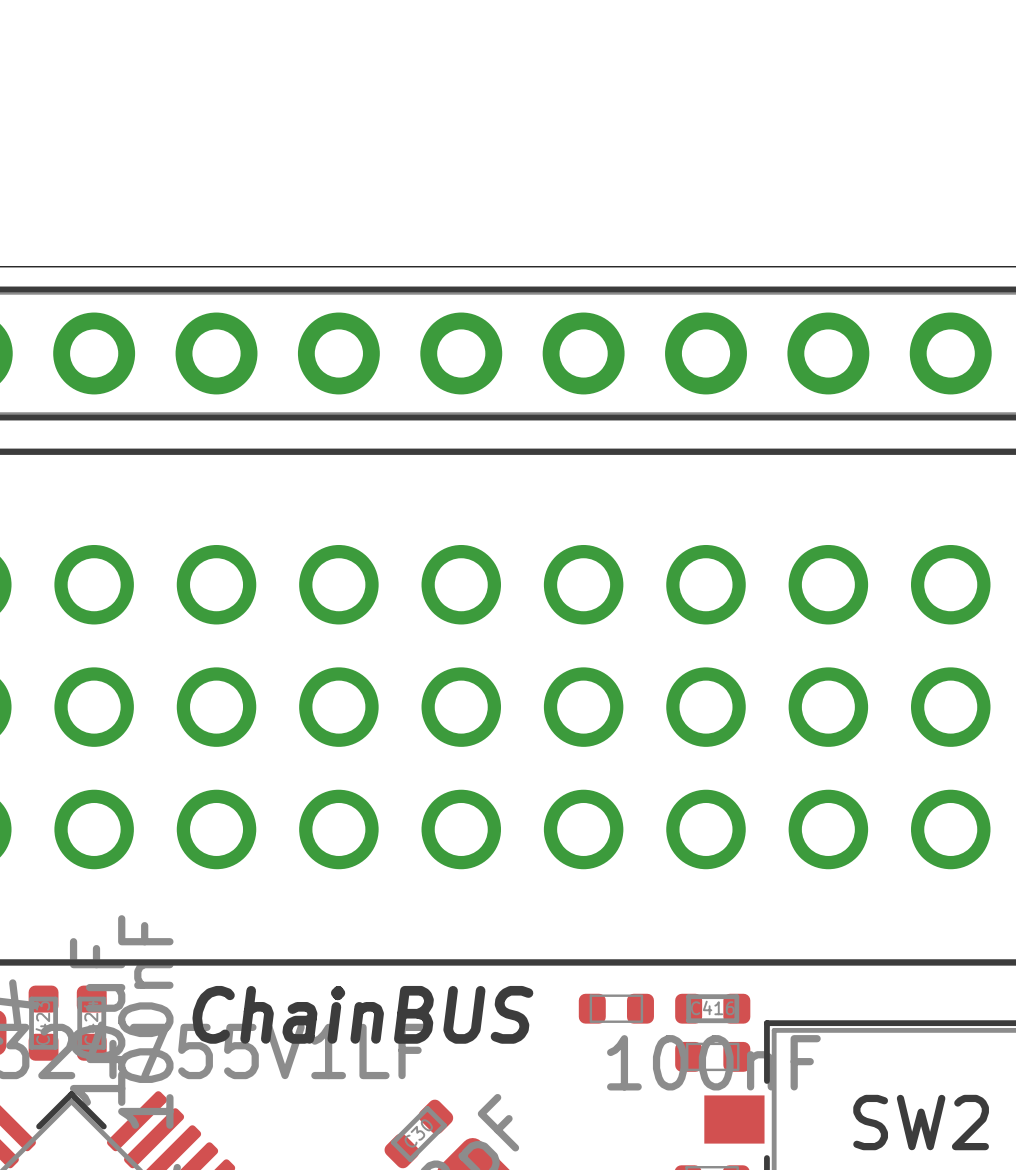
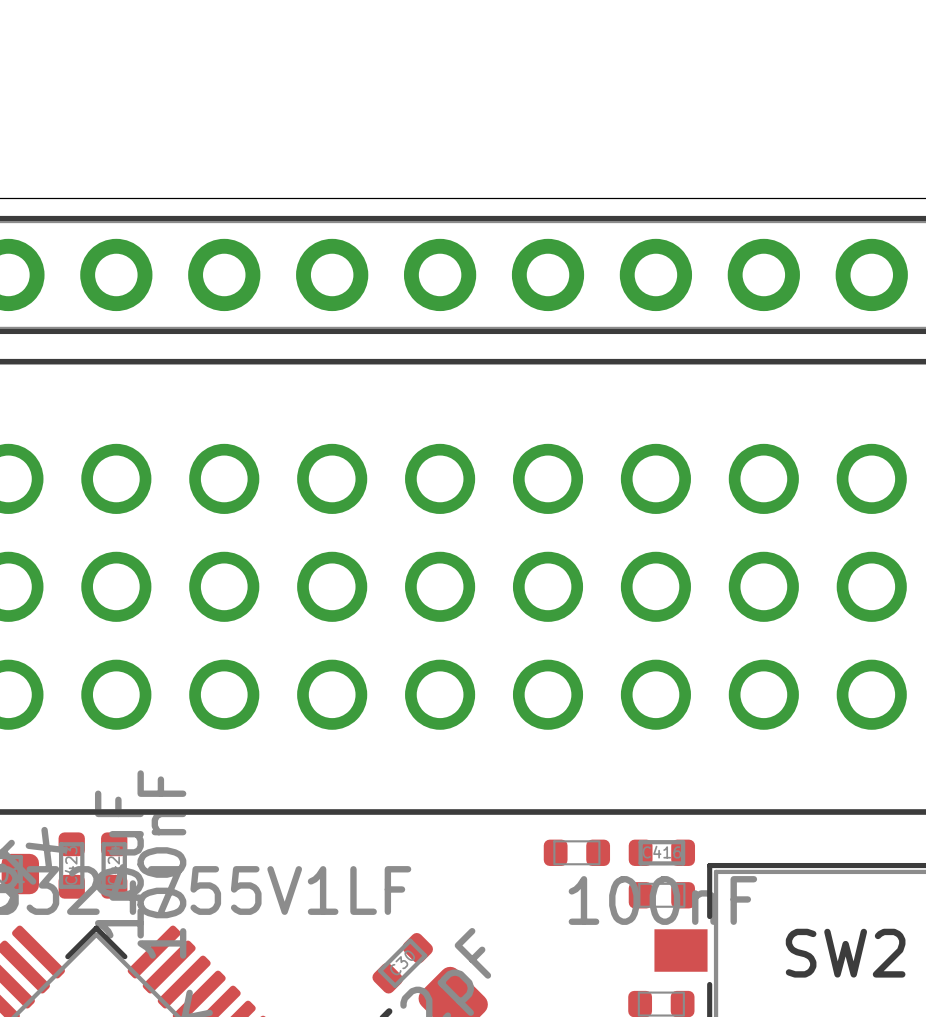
text: ChainBUS (362, 1014) -> none

